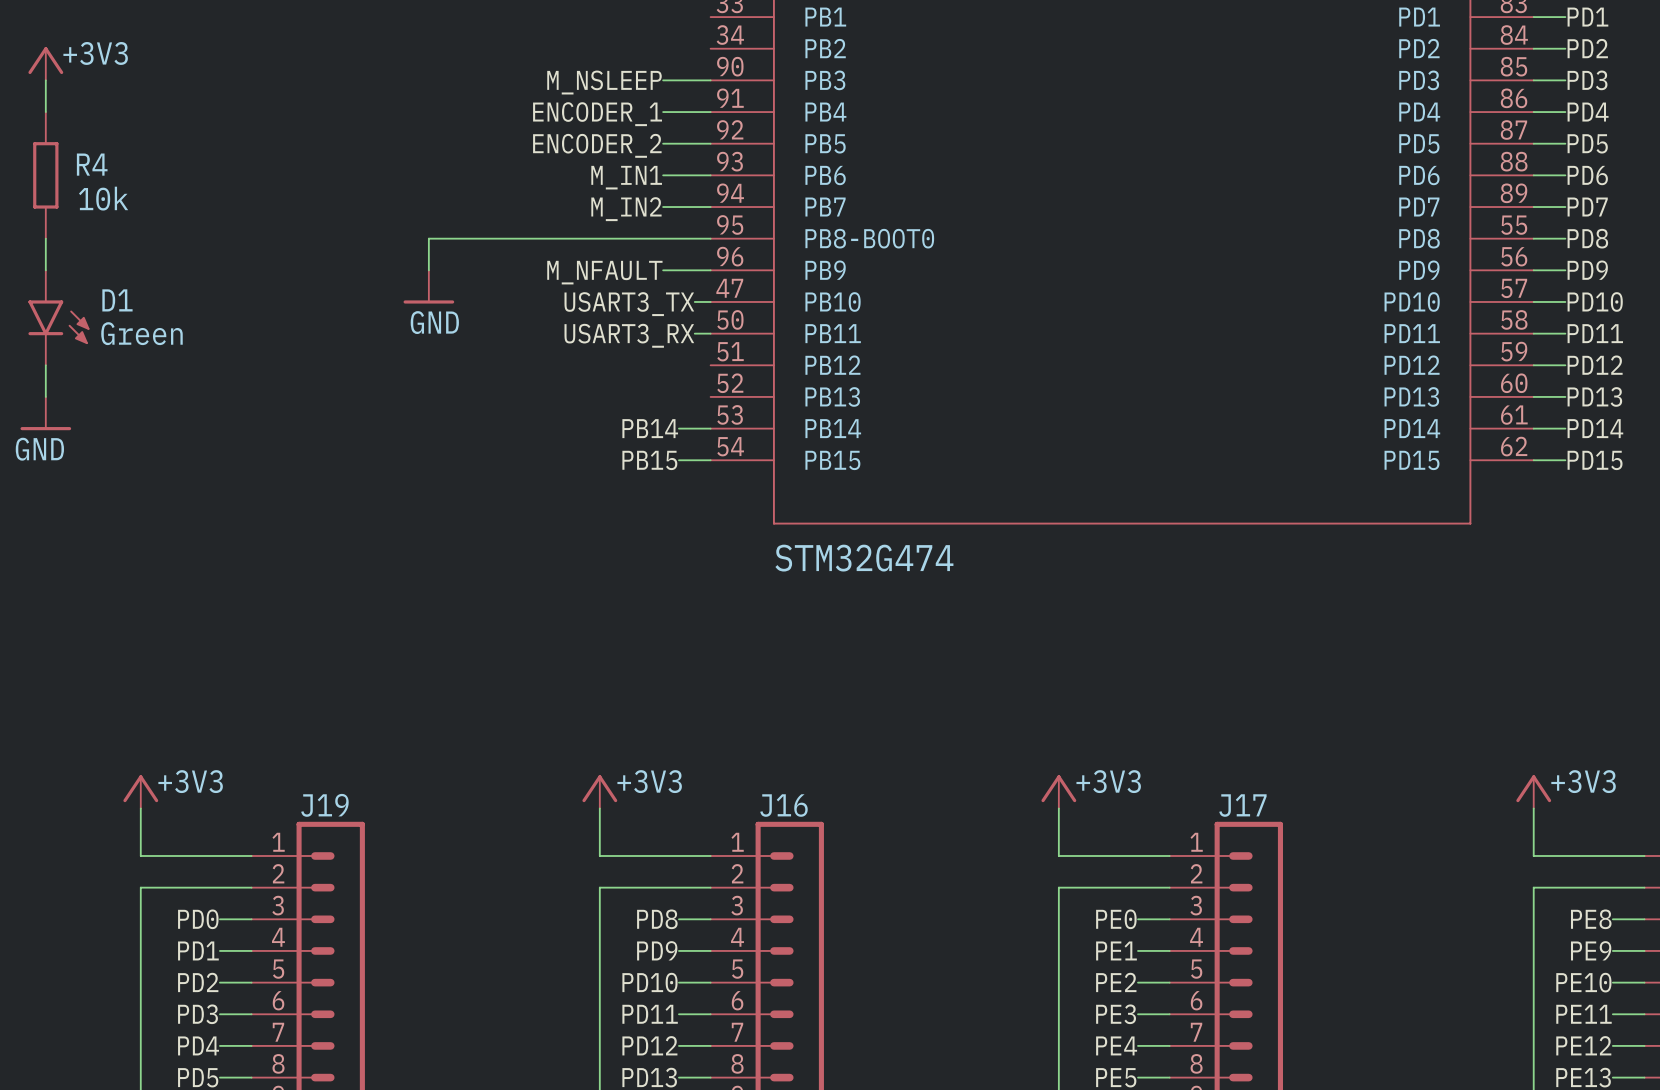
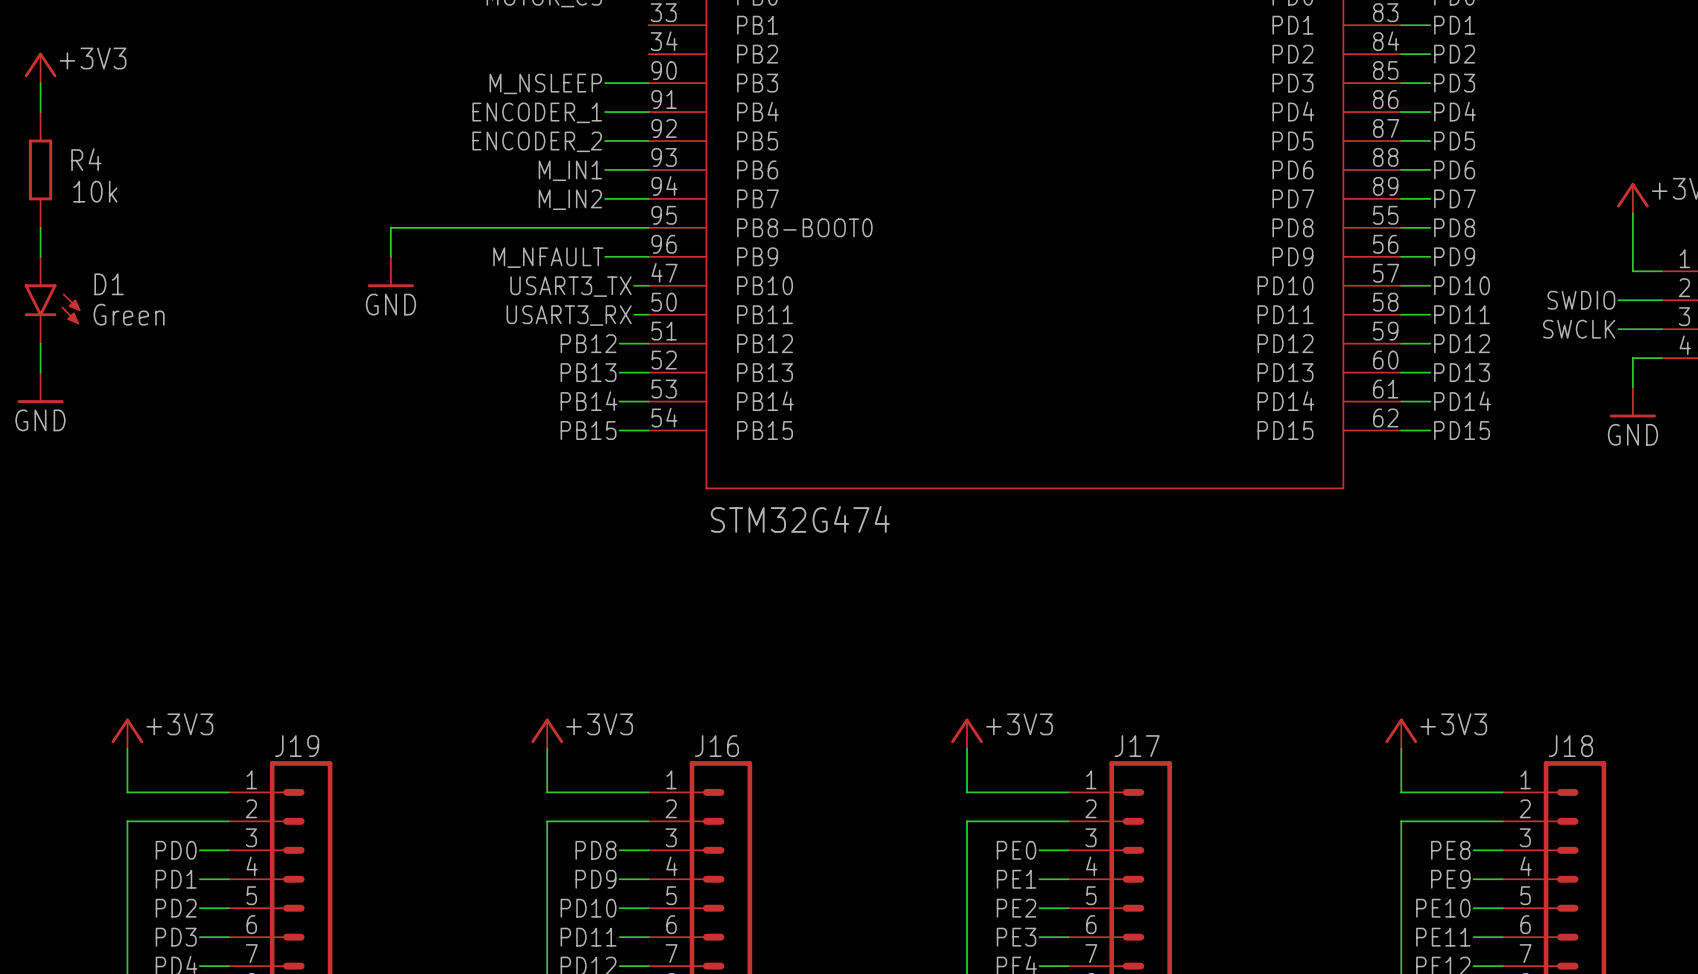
label: none -> PB12 (588, 343)
wire: none -> (619, 343) (648, 343)
label: none -> PB13 (588, 372)
wire: none -> (619, 372) (648, 372)

